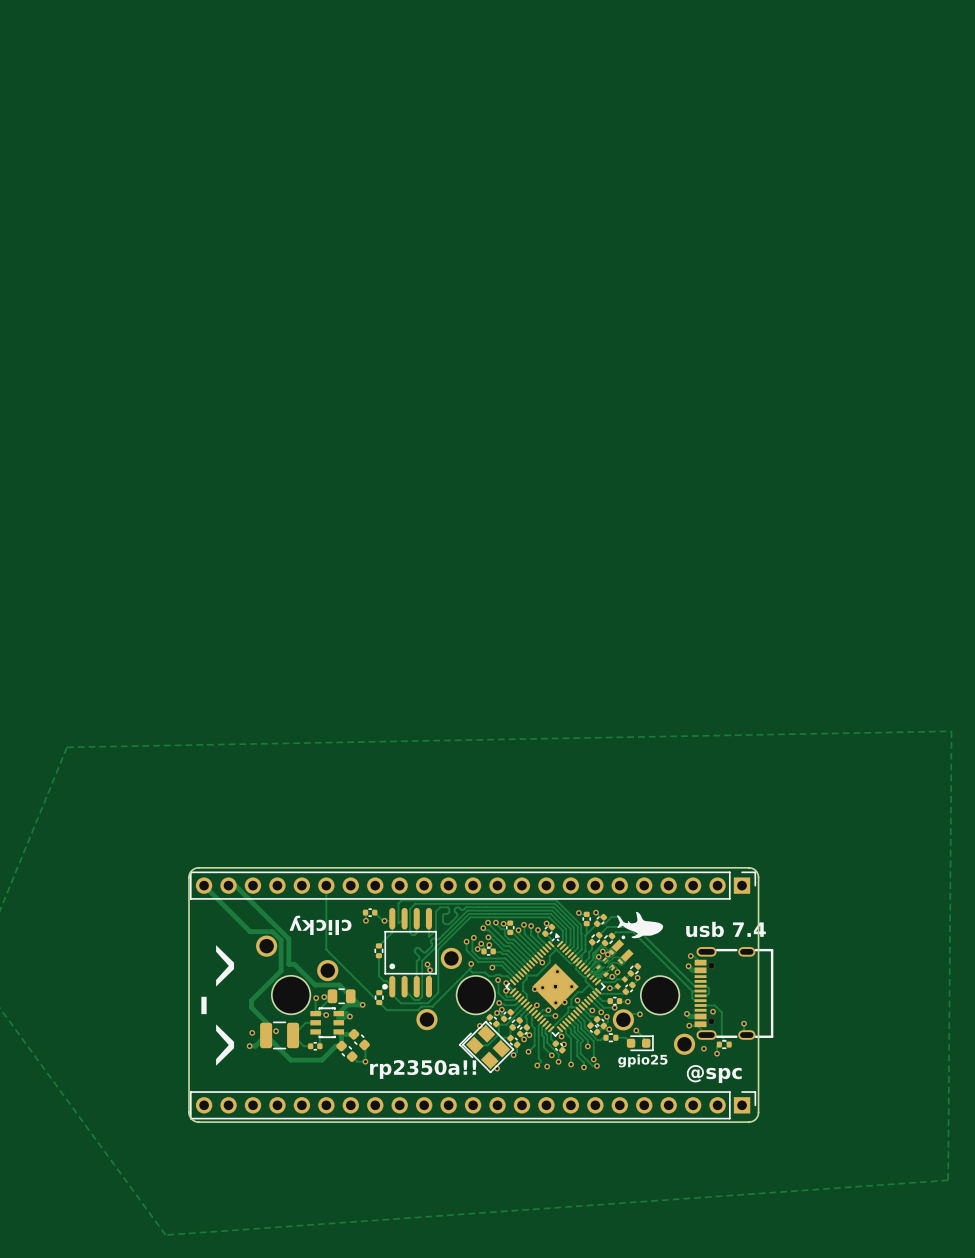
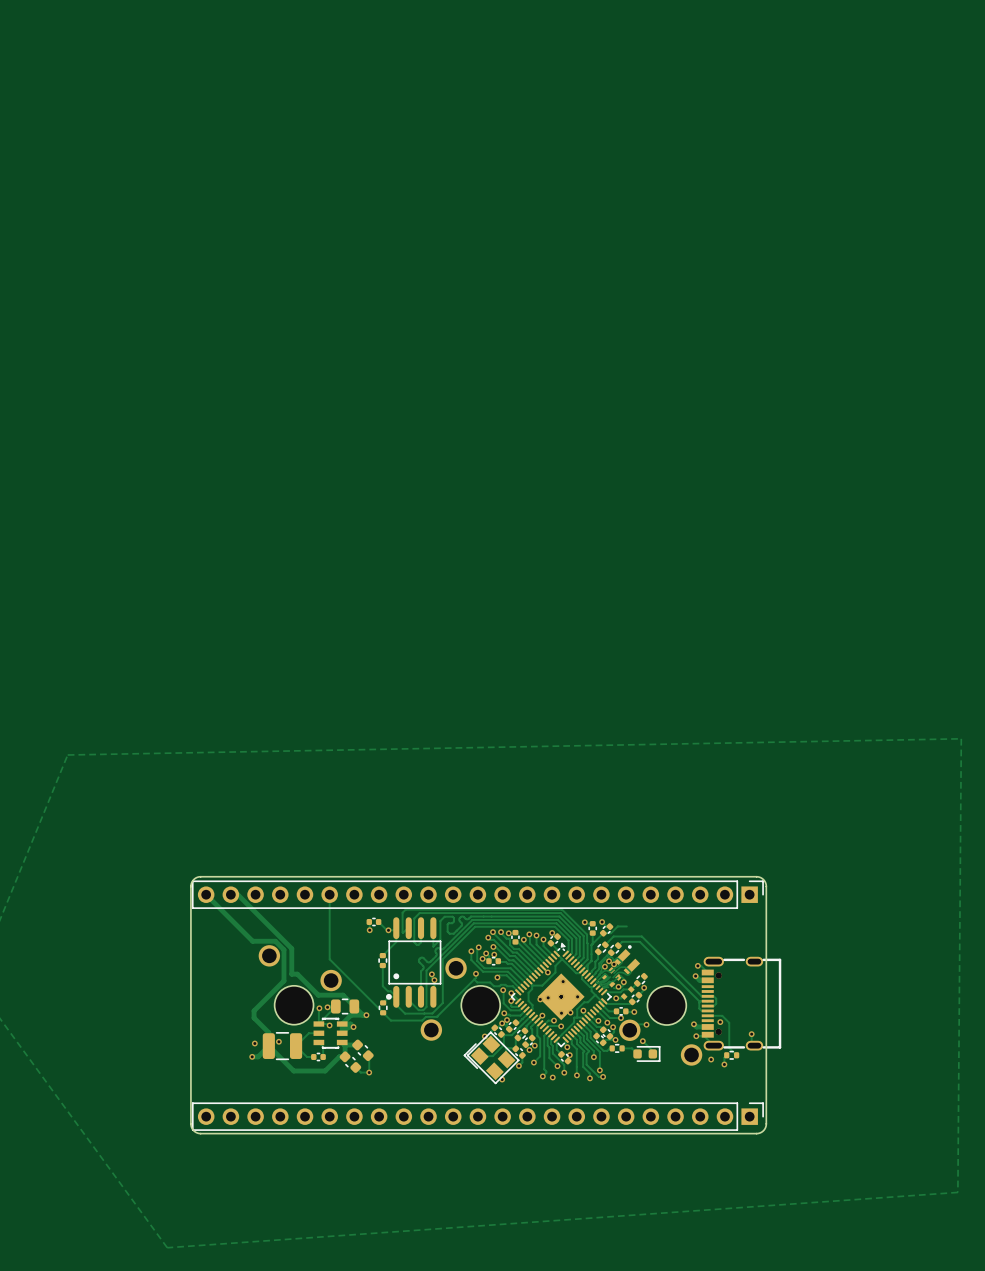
drawing: [617, 911, 664, 939] -> none
text: clicky (320, 925) -> none
text: usb 7.4 (726, 929) -> none
text: ^-^ (217, 1005) -> none
text: gpio25 (642, 1060) -> none
text: rp2350a!! (423, 1069) -> none
text: @spc (714, 1074) -> none

